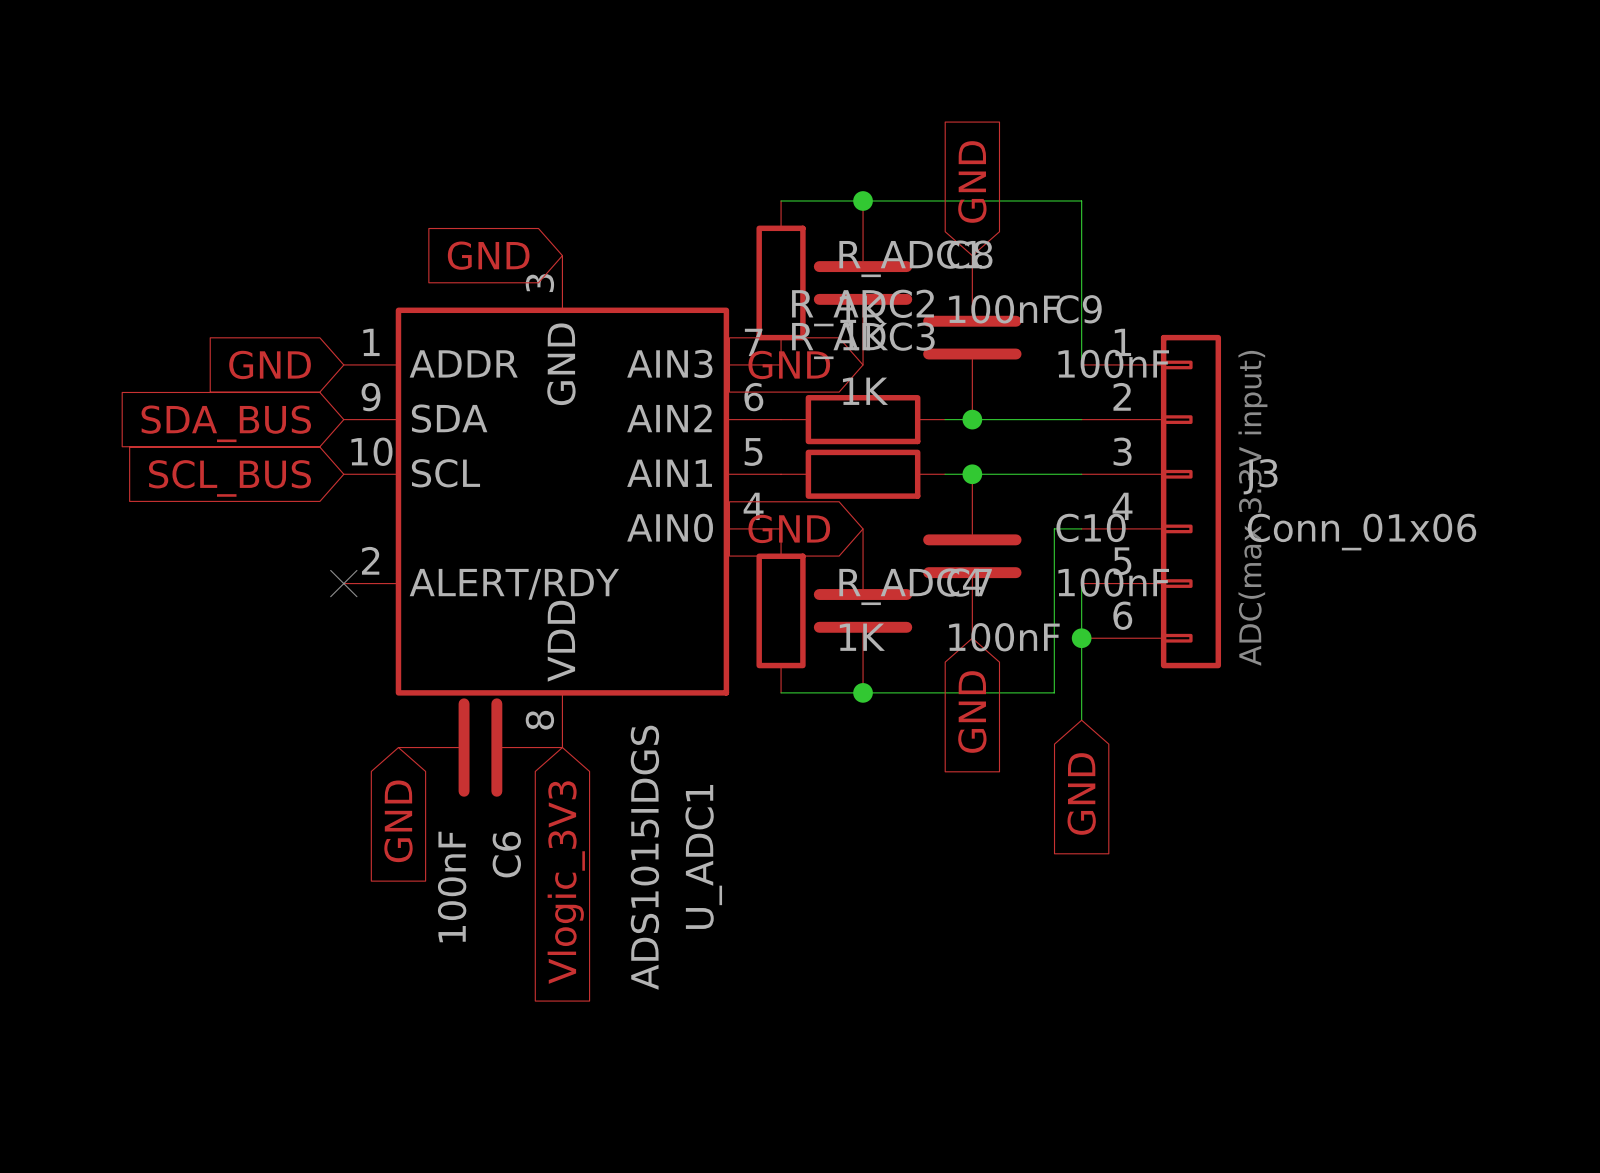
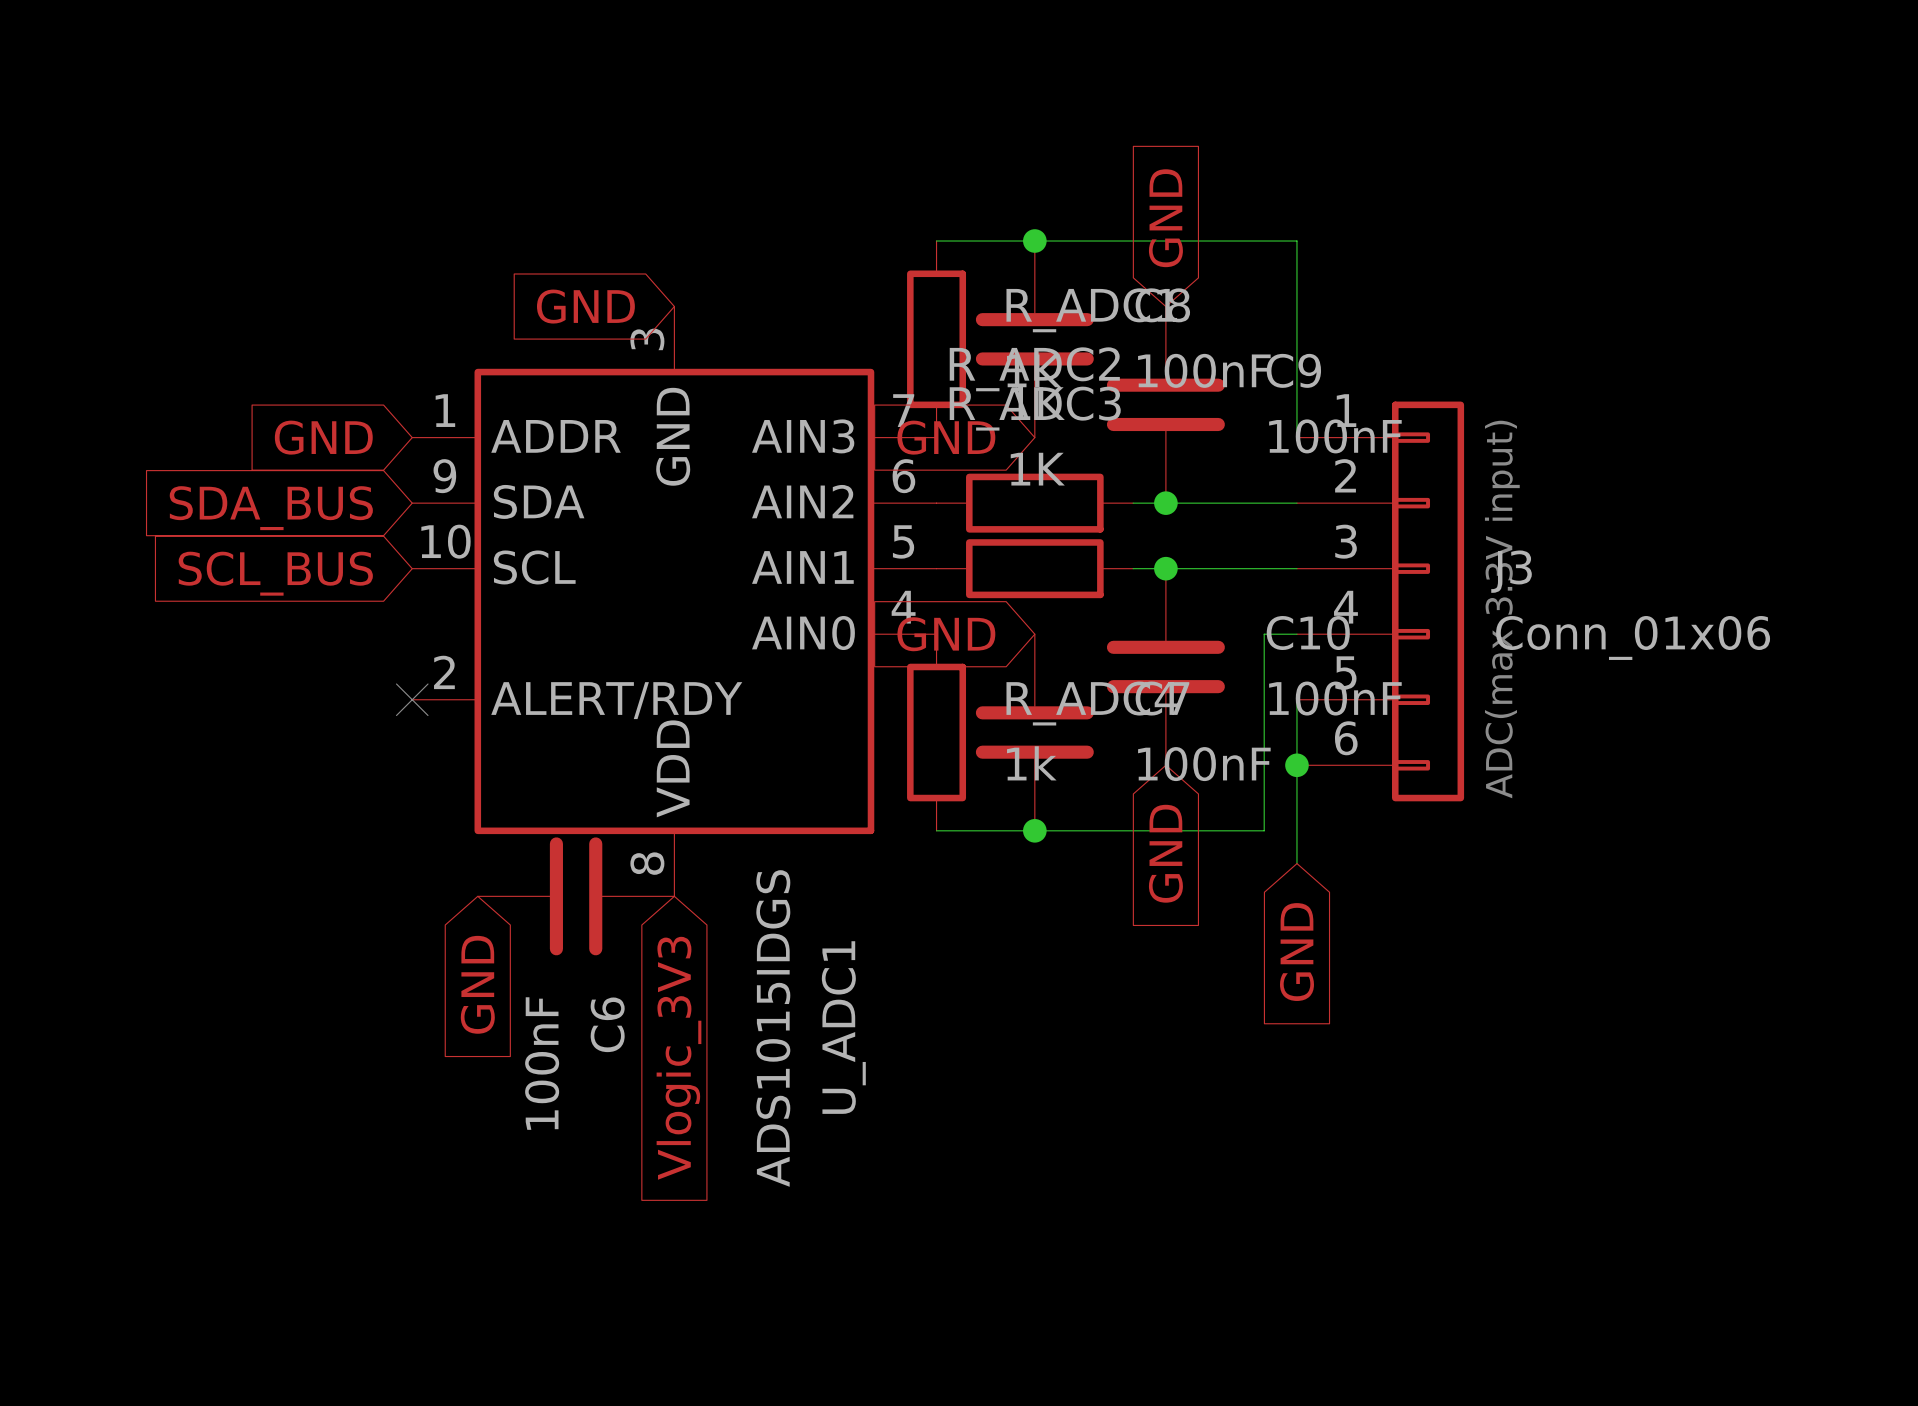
R_ADC4 value: 1K (862, 637) -> 1k (1031, 763)

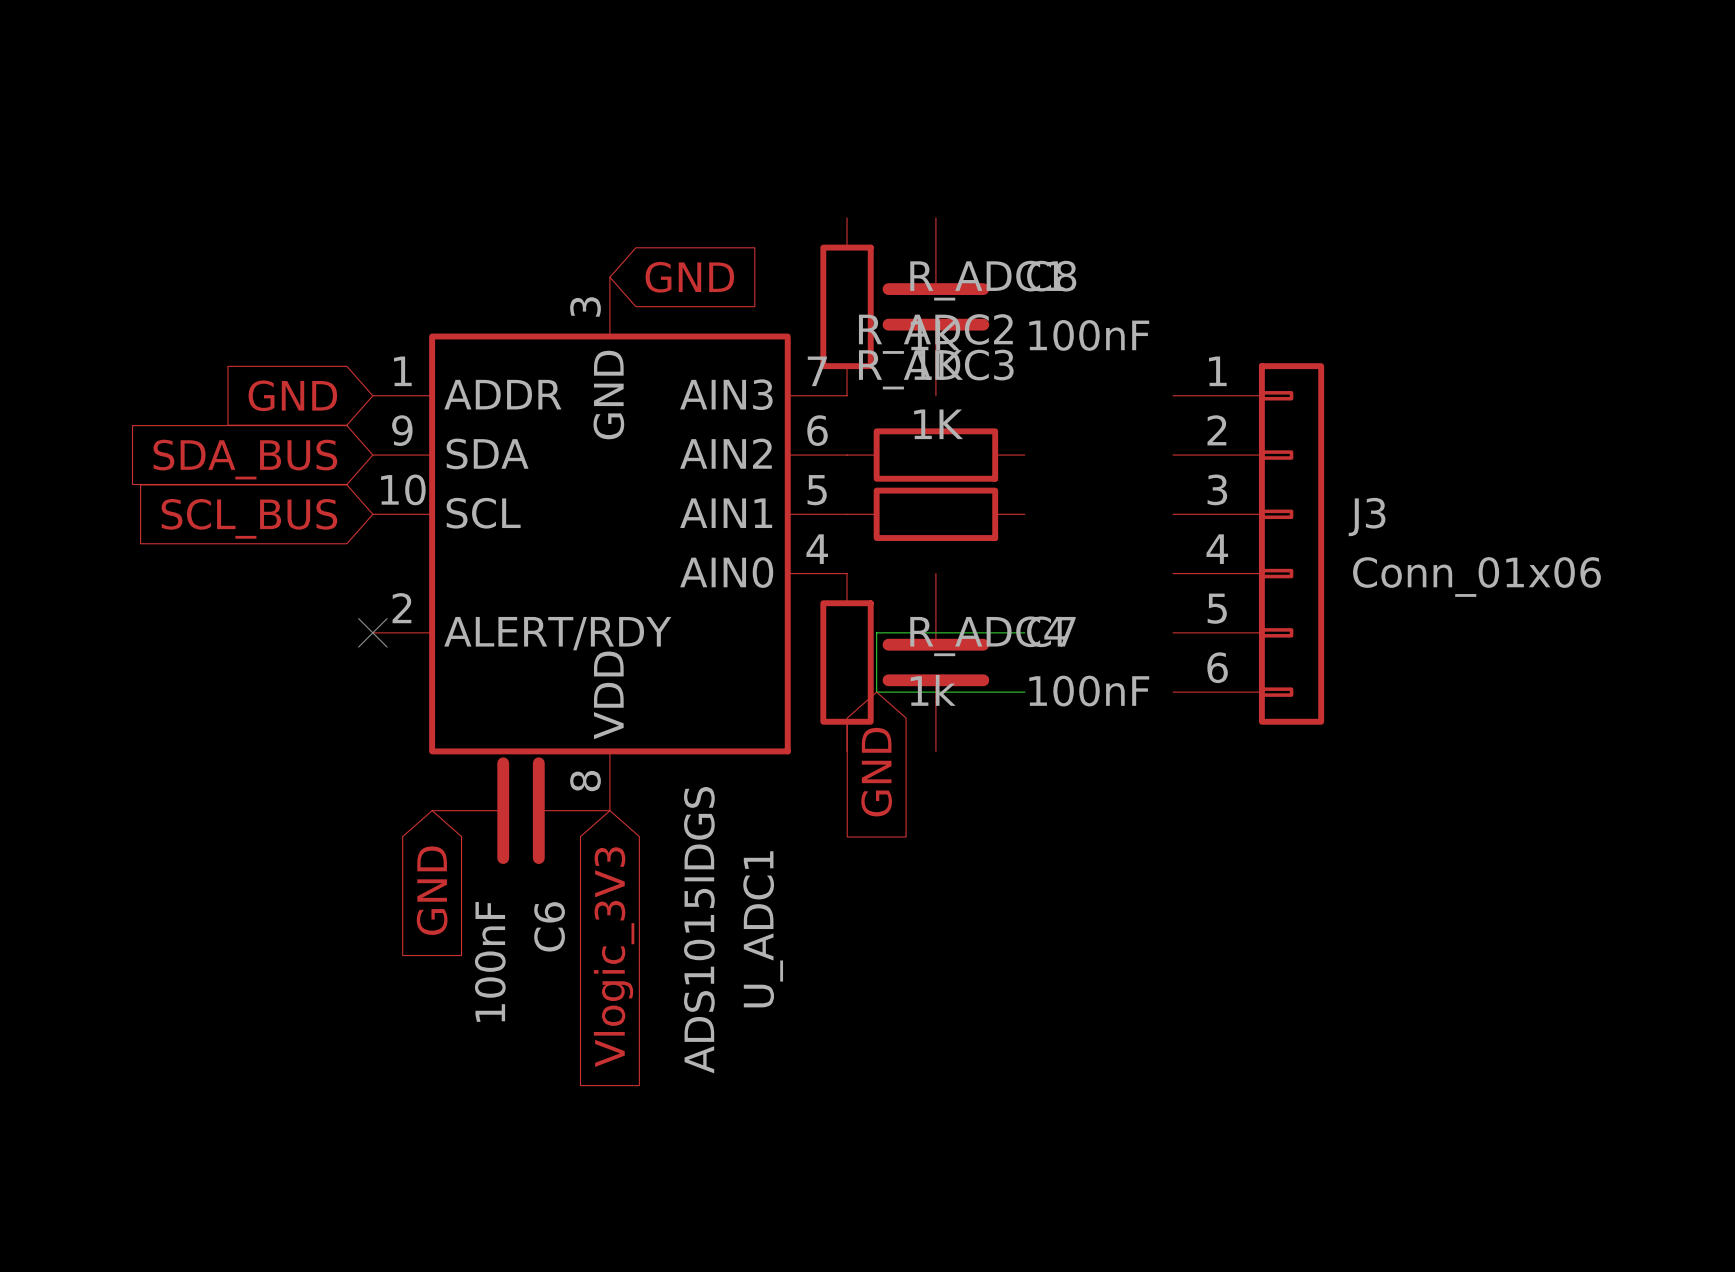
global label: GND (1165, 218) -> none
wire: (936, 241) (1296, 241) (1296, 437) -> none
junction: (1034, 241) -> none
global label rotation: 0° (585, 306) -> 180° (689, 277)
C9: 100nF (1165, 404) -> none
global label: GND (946, 437) -> none
wire: (1133, 503) (1296, 503) -> none
junction: (1165, 503) -> none
wire: (1133, 568) (1296, 568) -> none
junction: (1165, 568) -> none
text: ADC(max 3.3V input) (1502, 609) -> none
global label: GND (946, 634) -> none
wire: (1296, 634) (1264, 634) (1264, 830) (936, 830) -> none
C10: 100nF (1165, 666) -> none
wire: none -> (1024, 632) (876, 632) (876, 692) (1024, 692)
wire: (1296, 699) (1296, 863) -> none
junction: (1296, 765) -> none
junction: (1034, 830) -> none
global label: none -> GND (876, 772)
global label: GND (1165, 853) -> none
global label: GND (1297, 952) -> none

